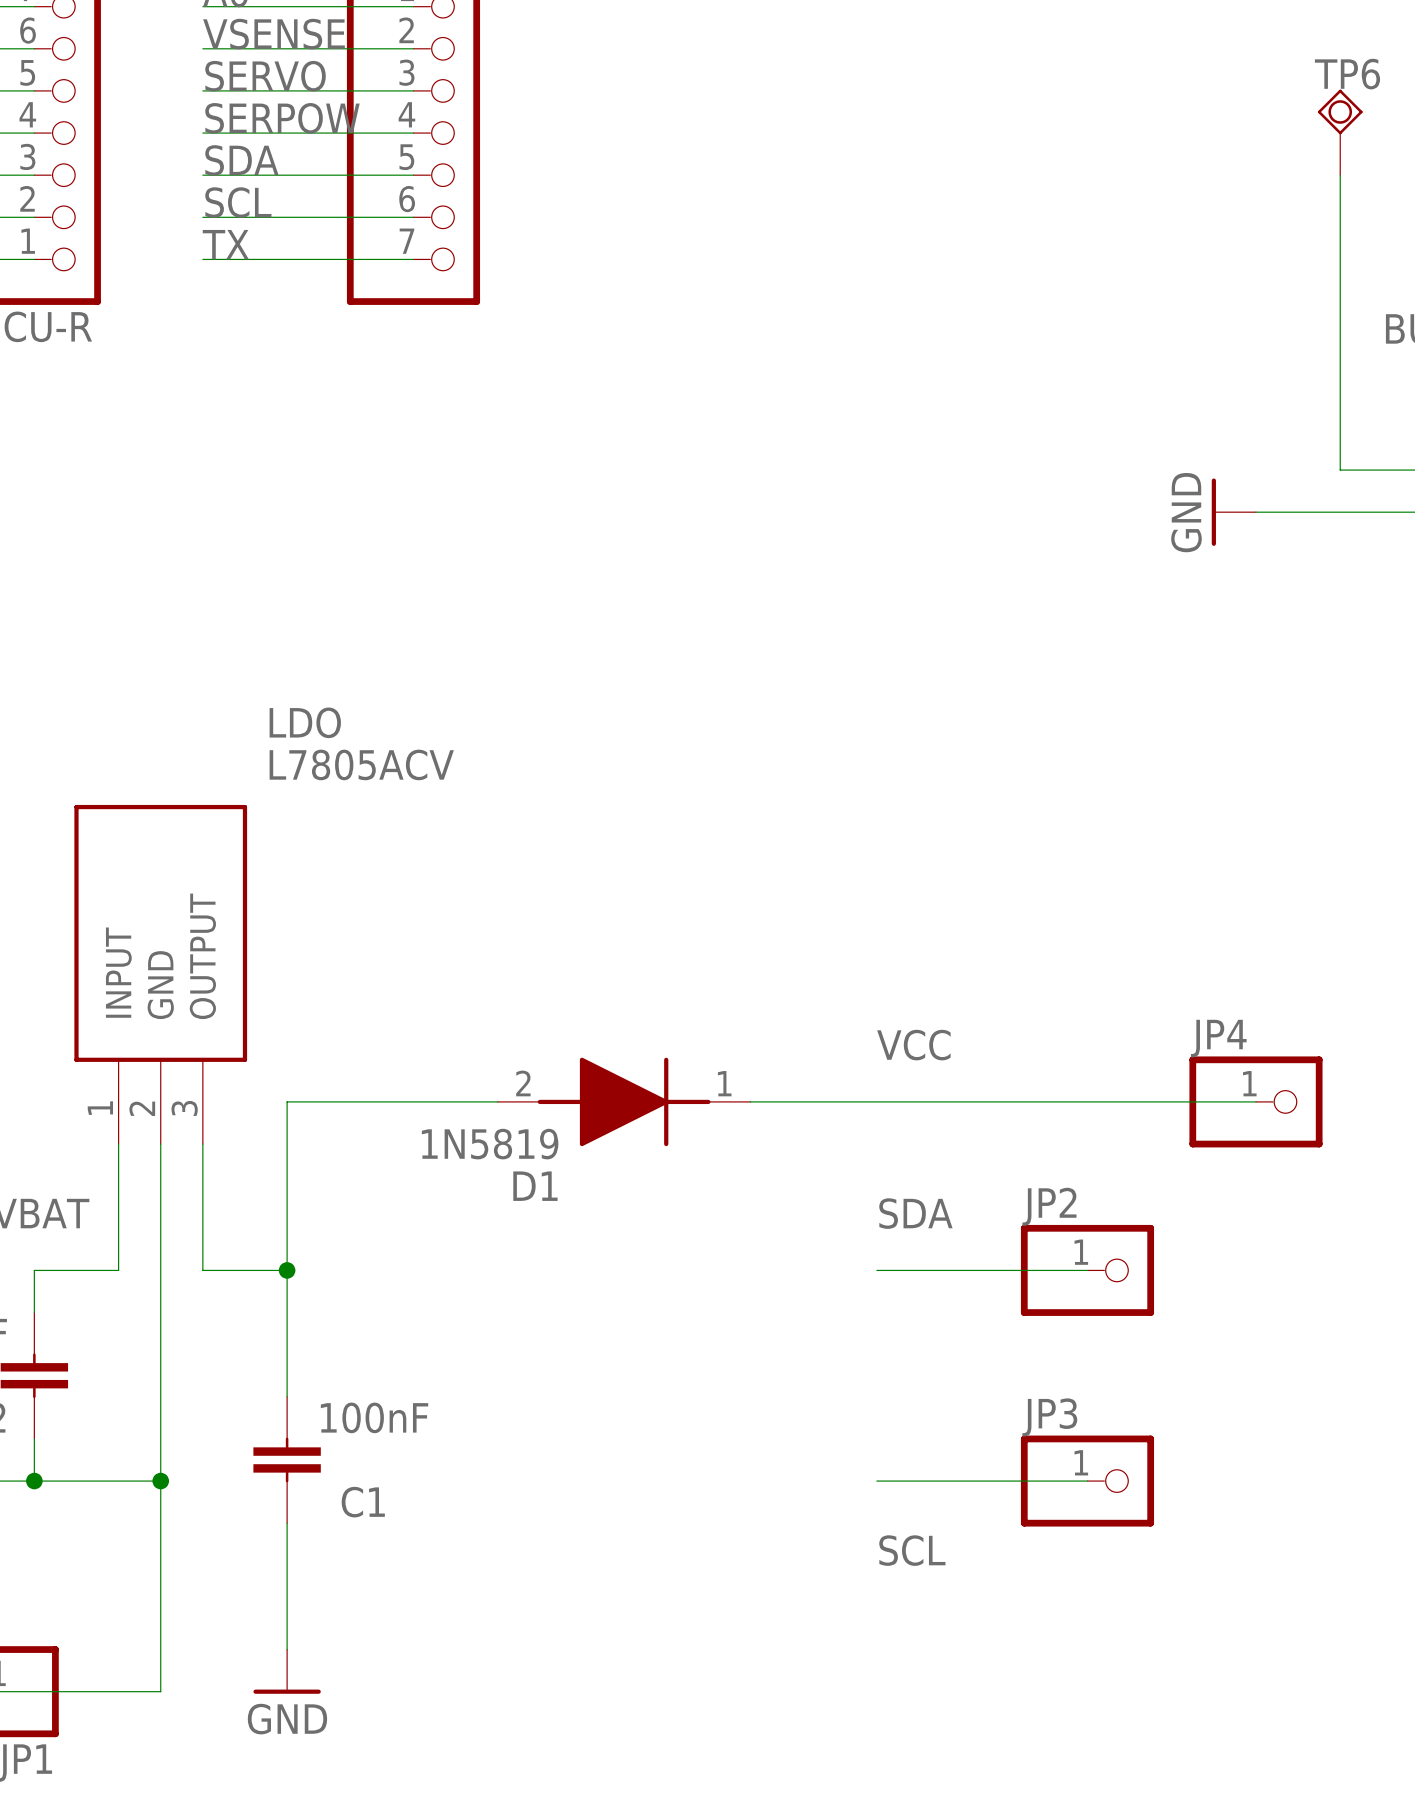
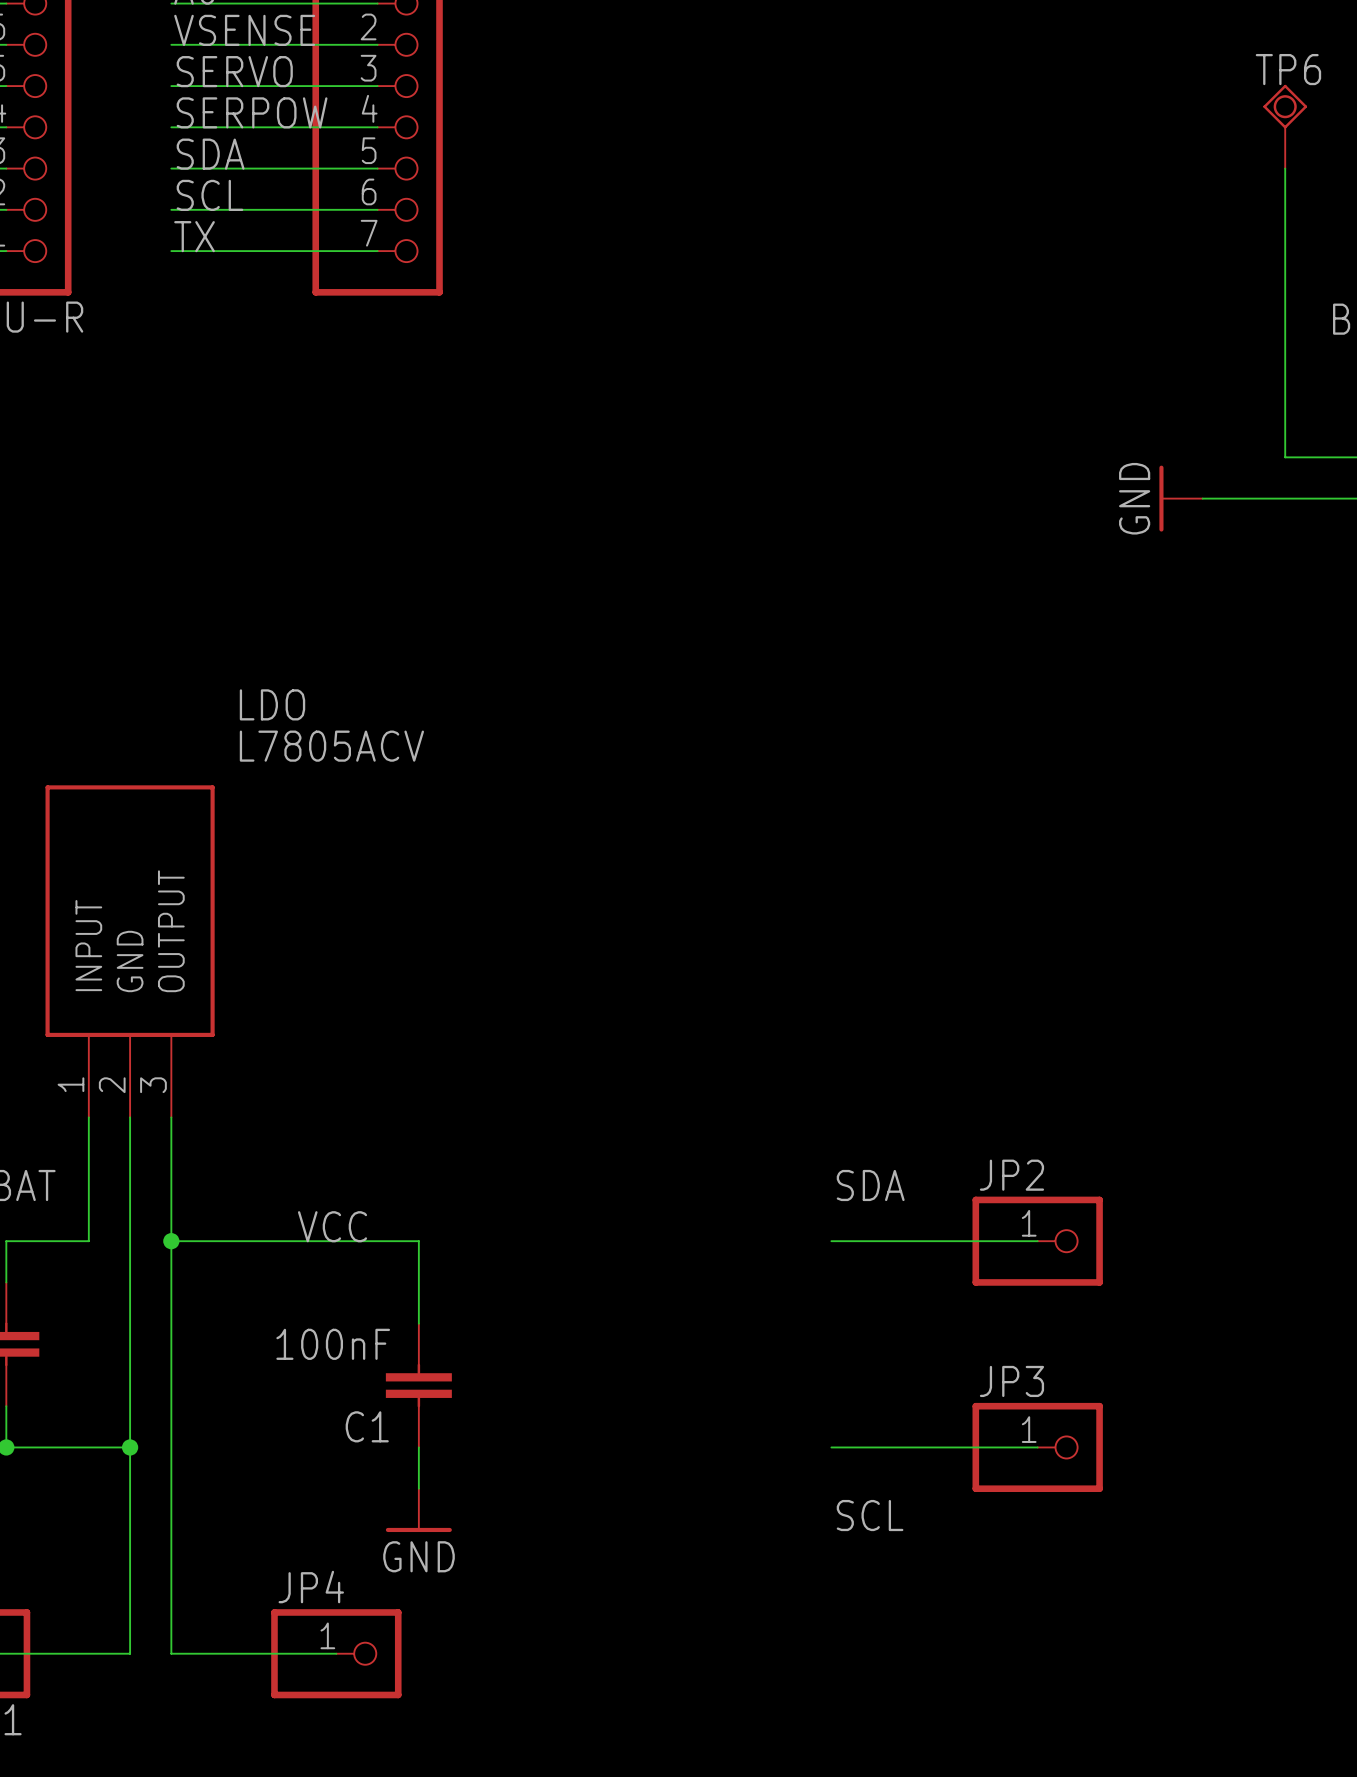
label: VCC (913, 1045) -> none
wire: (497, 1101) (287, 1101) (287, 1396) -> none
D1: 1N5819 (624, 1101) -> none
wire: (750, 1101) (1255, 1101) -> none
JP4 position: (1255, 1101) -> (336, 1653)
label: none -> VCC (332, 1226)
wire: none -> (171, 1241) (171, 1653) (336, 1653)
wire: none -> (253, 1241) (418, 1241) (418, 1323)
junction position: (287, 1270) -> (171, 1241)
C1 value position: 100nF (374, 1417) -> 100nF (333, 1344)
C1 position: (287, 1459) -> (418, 1385)
wire: none -> (418, 1447) (418, 1488)
C1 name position: C1 (363, 1502) -> C1 (367, 1426)
wire: (287, 1523) (287, 1649) -> none
power symbol position: GND (287, 1671) -> GND (418, 1510)

